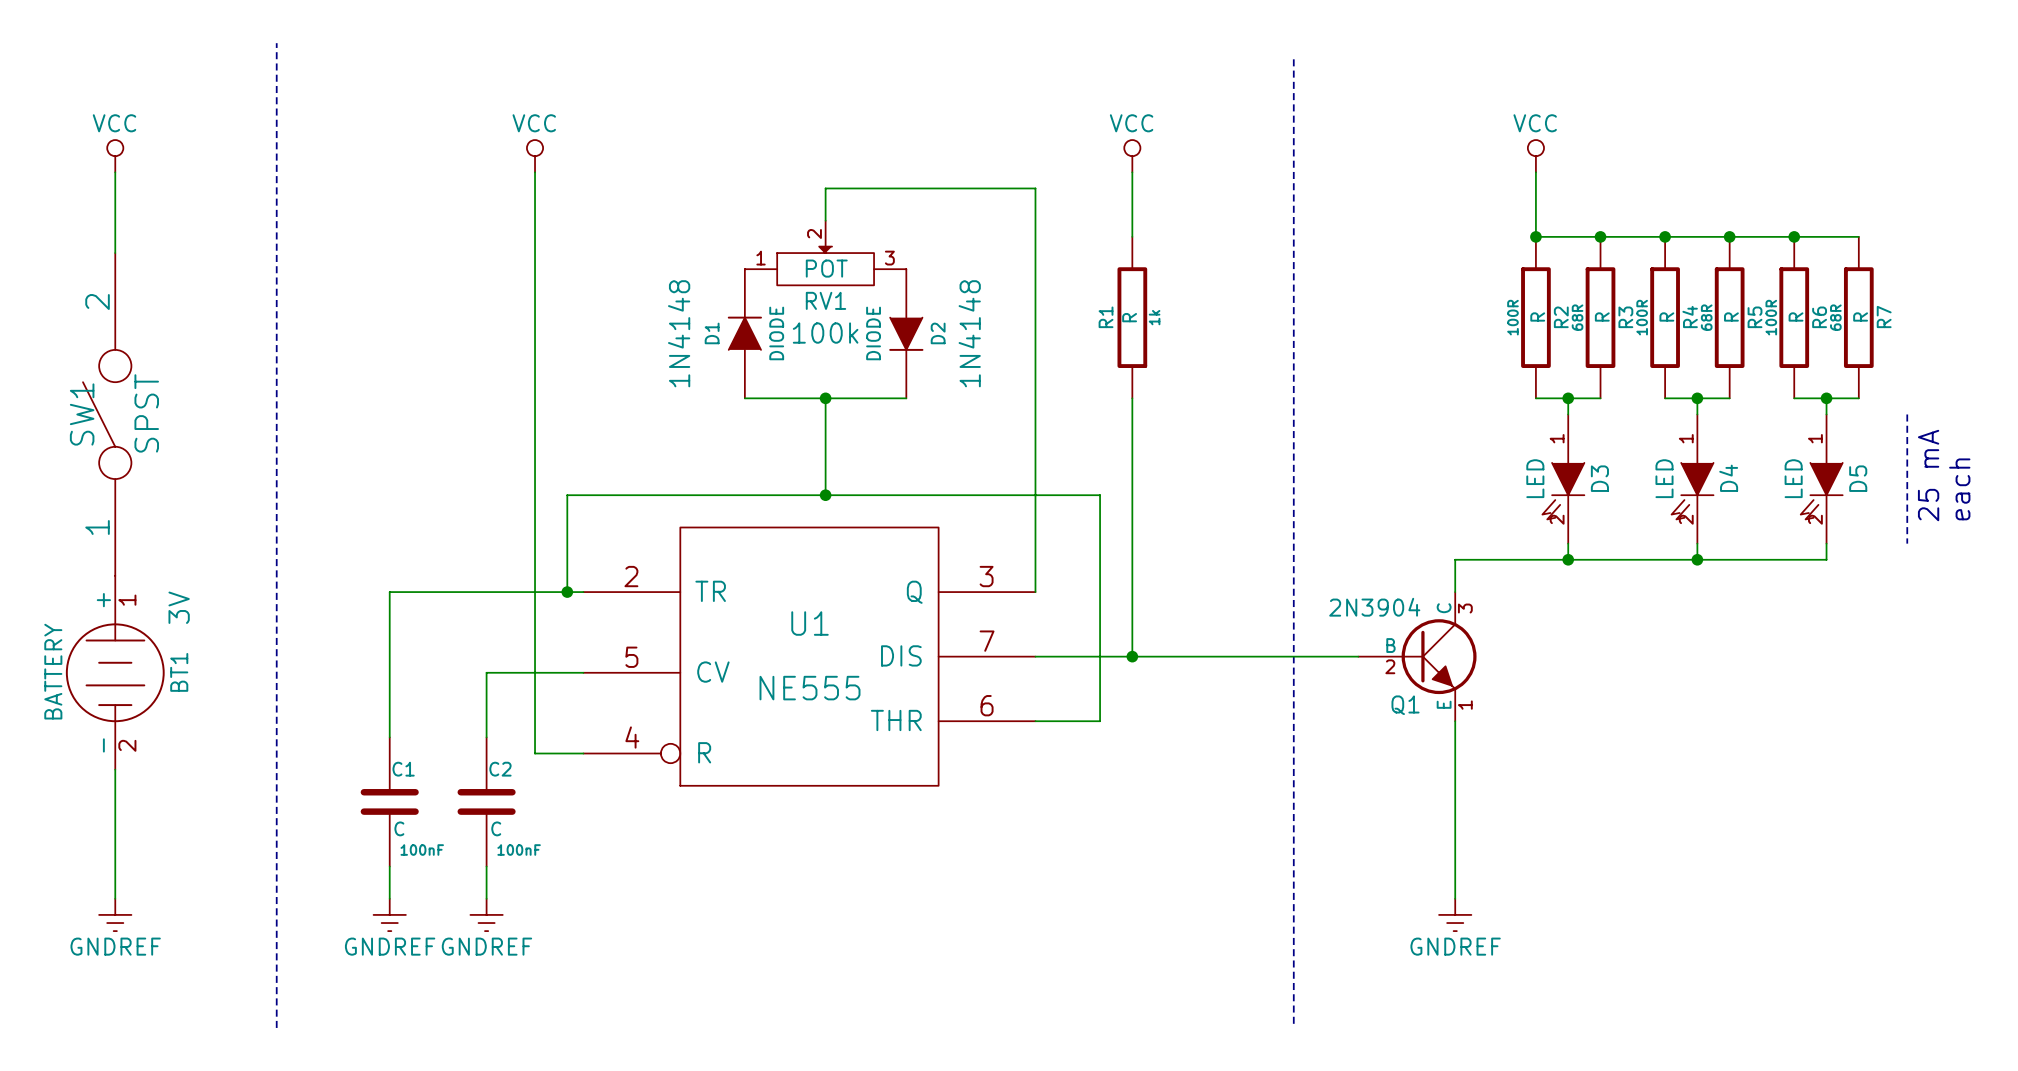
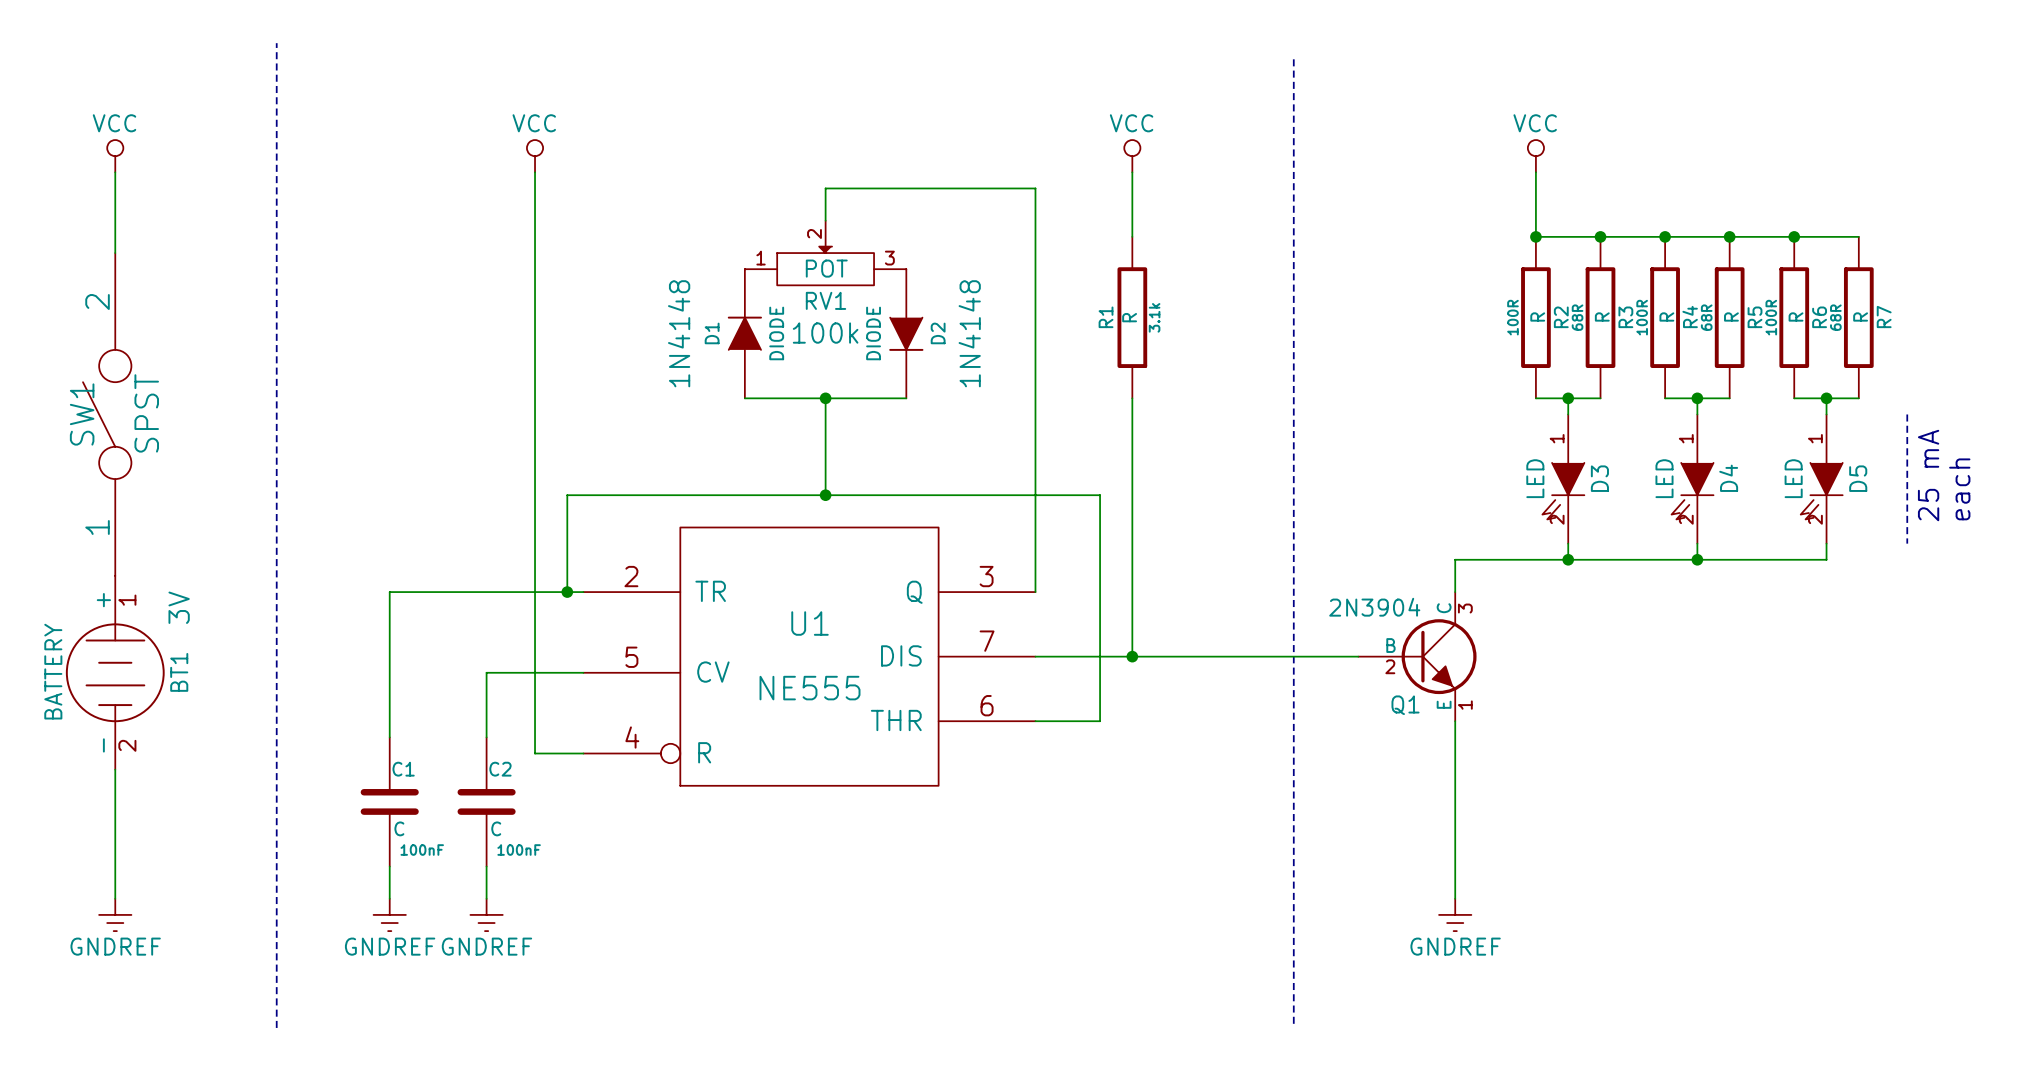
R1 text: 1k (1154, 317) -> 3.1k (1154, 317)

